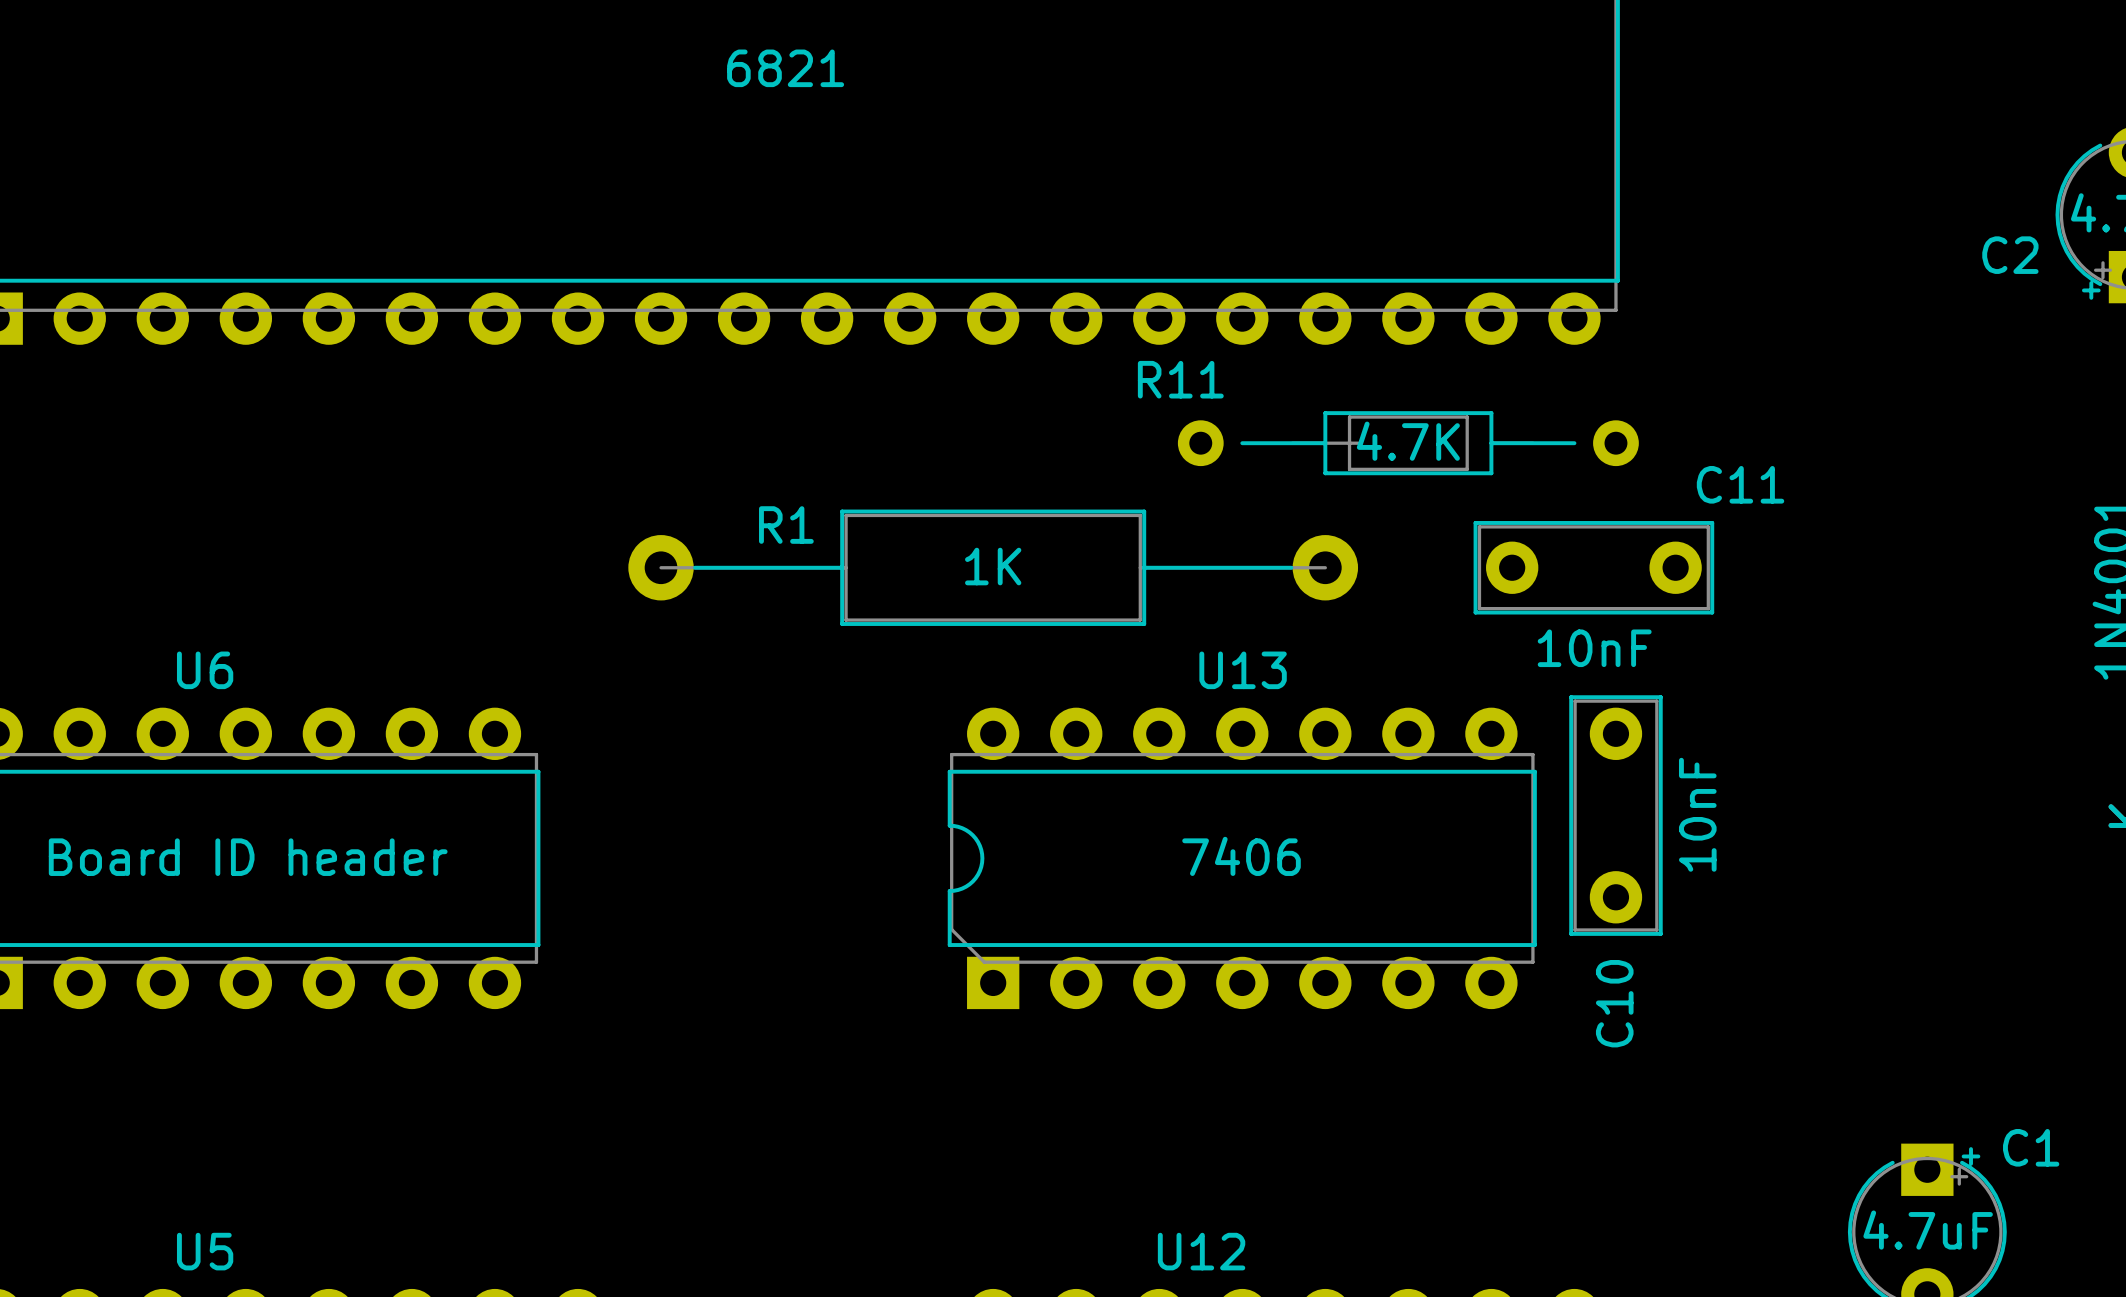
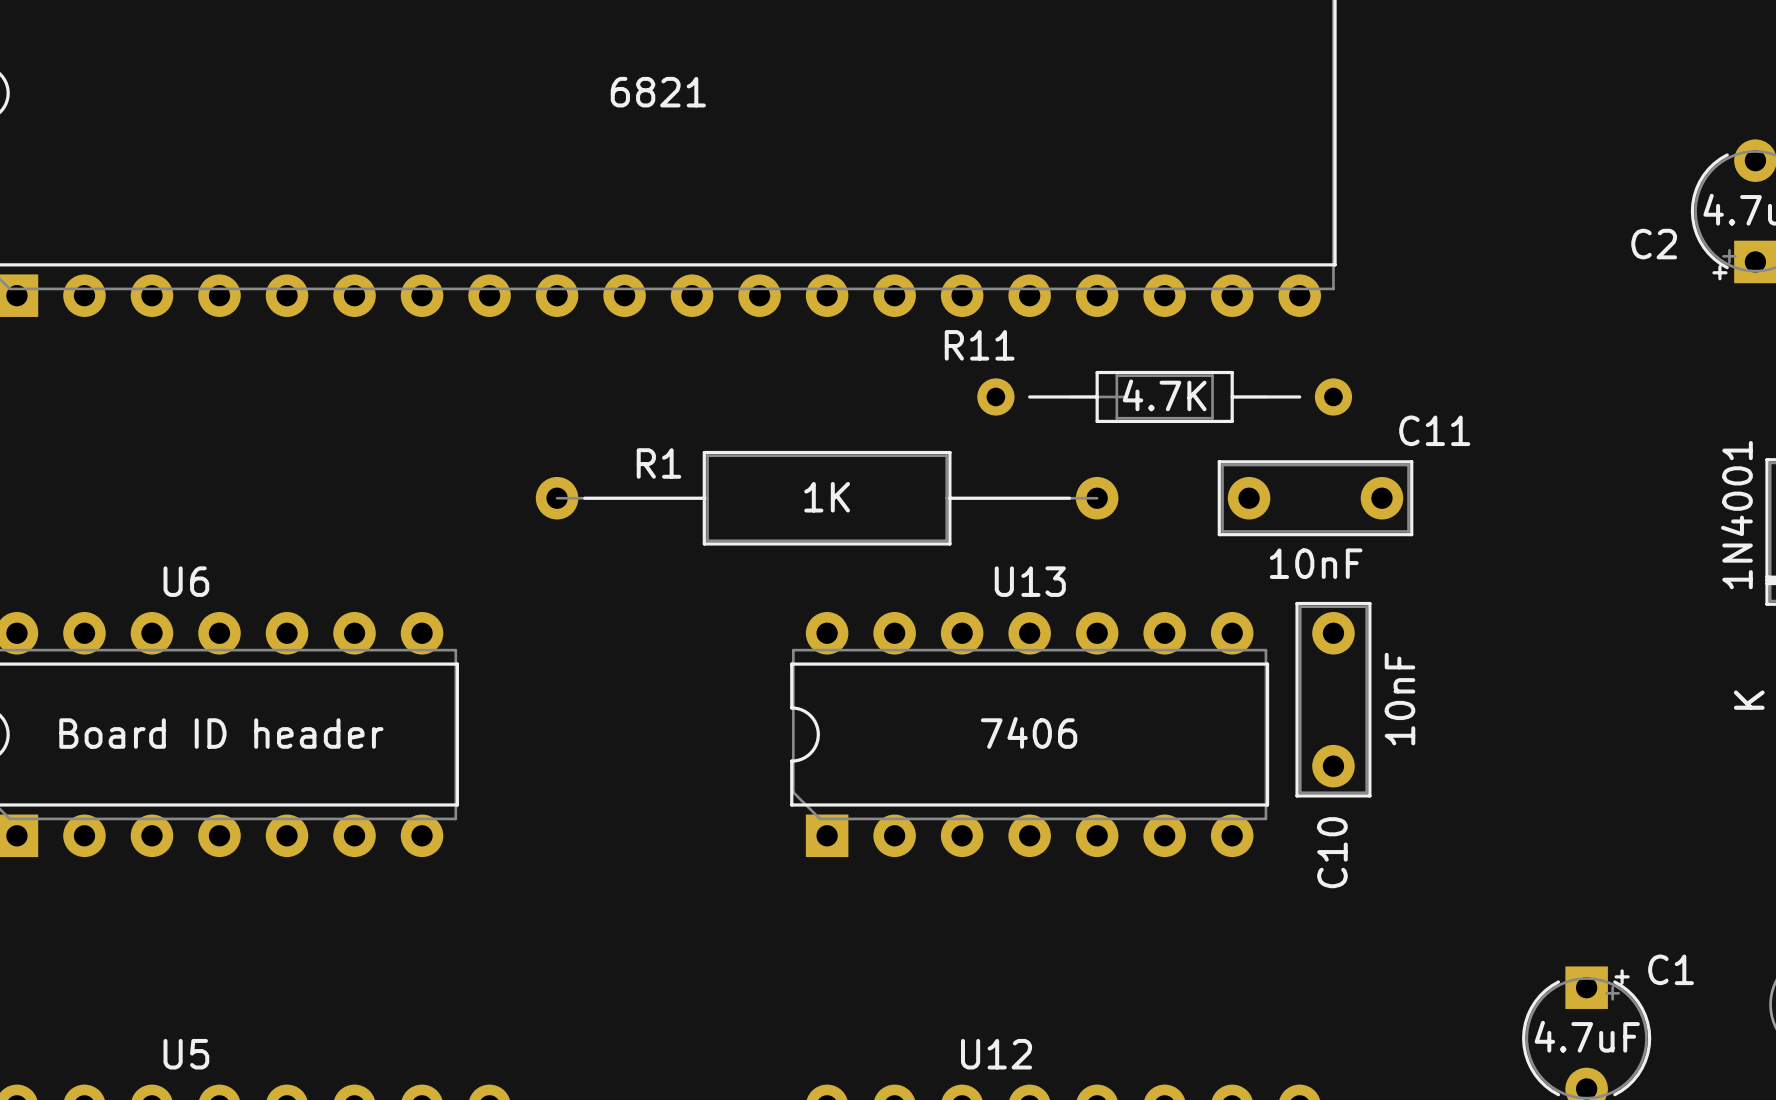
R1 footprint: [628, 509, 1359, 626] -> [535, 450, 1119, 546]

